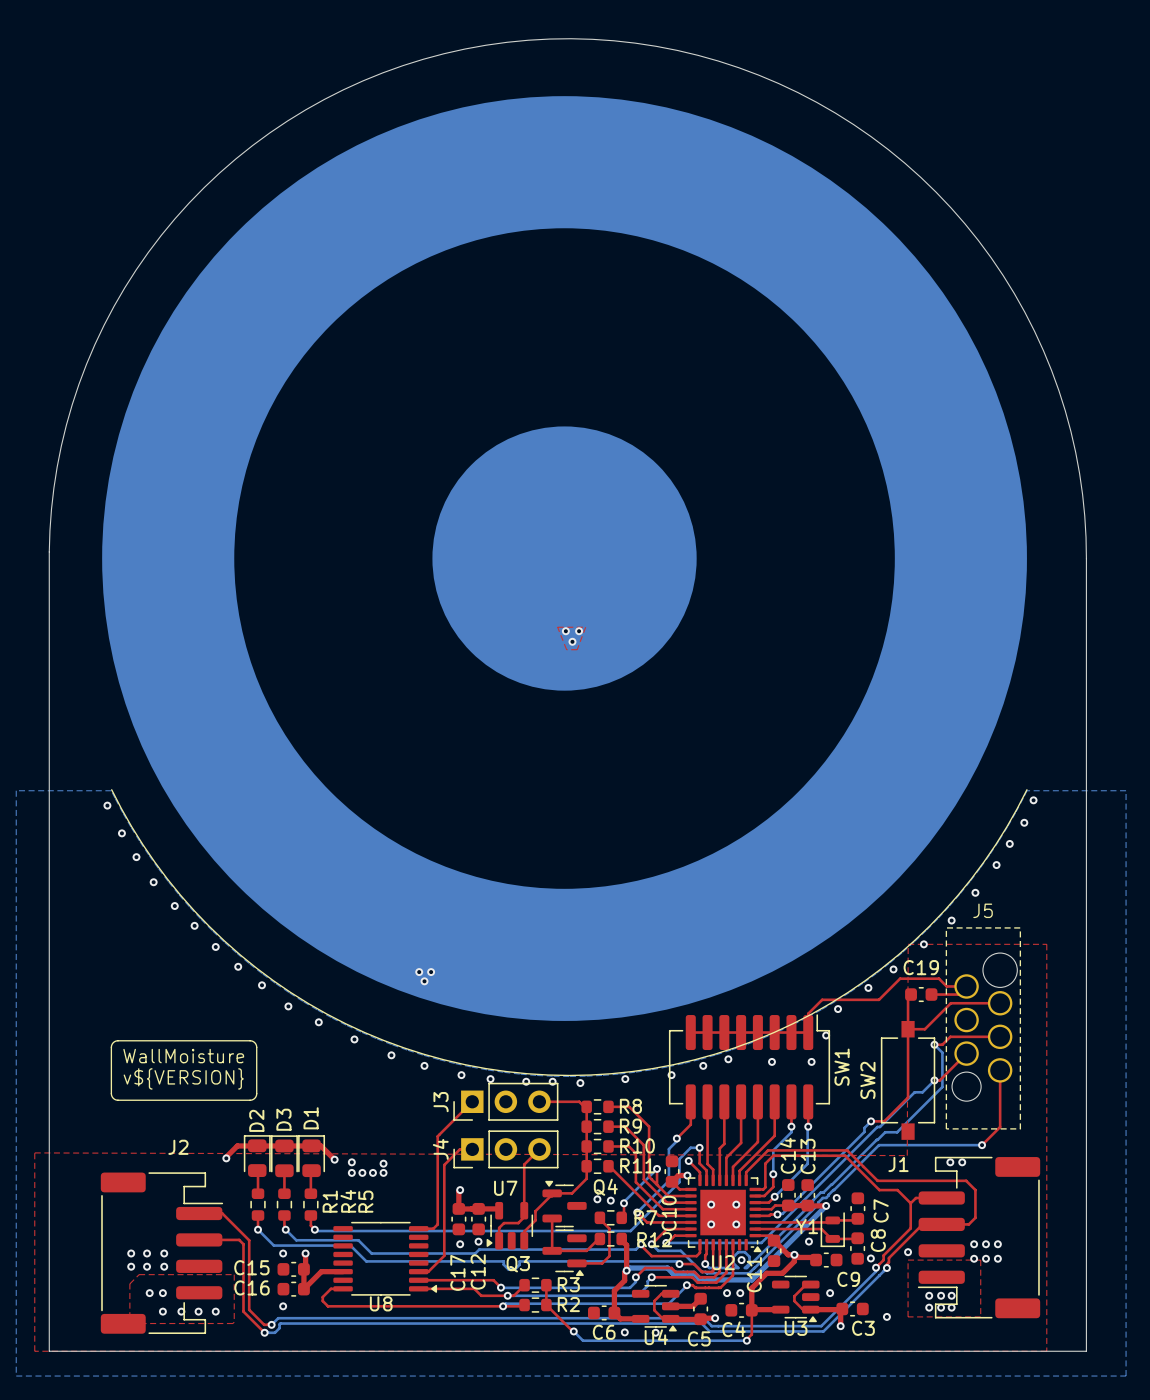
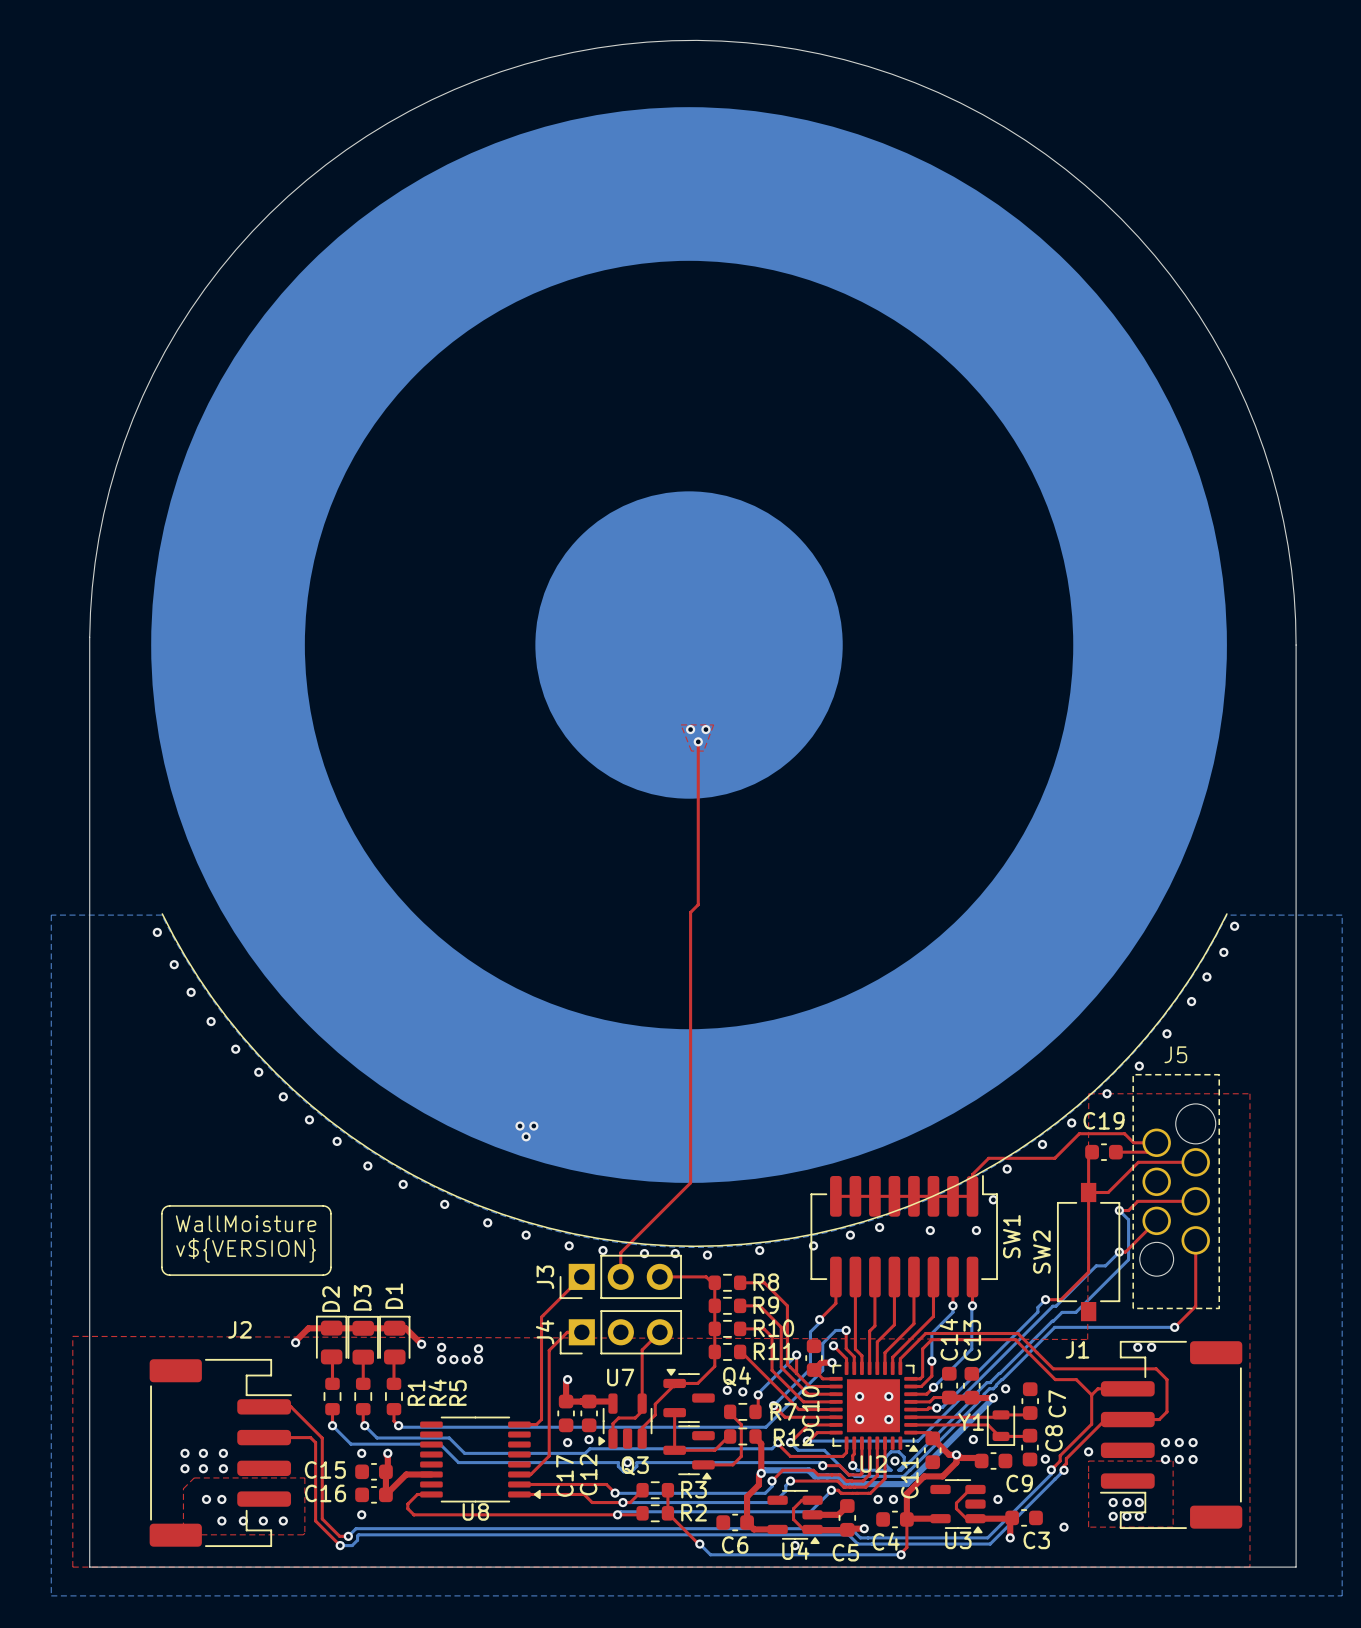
top track: none -> (698, 744) (698, 904) (690, 912) (690, 1182) (620, 1252) (620, 1276)
via: none -> (627, 1462)
via: (624, 1332) -> none

